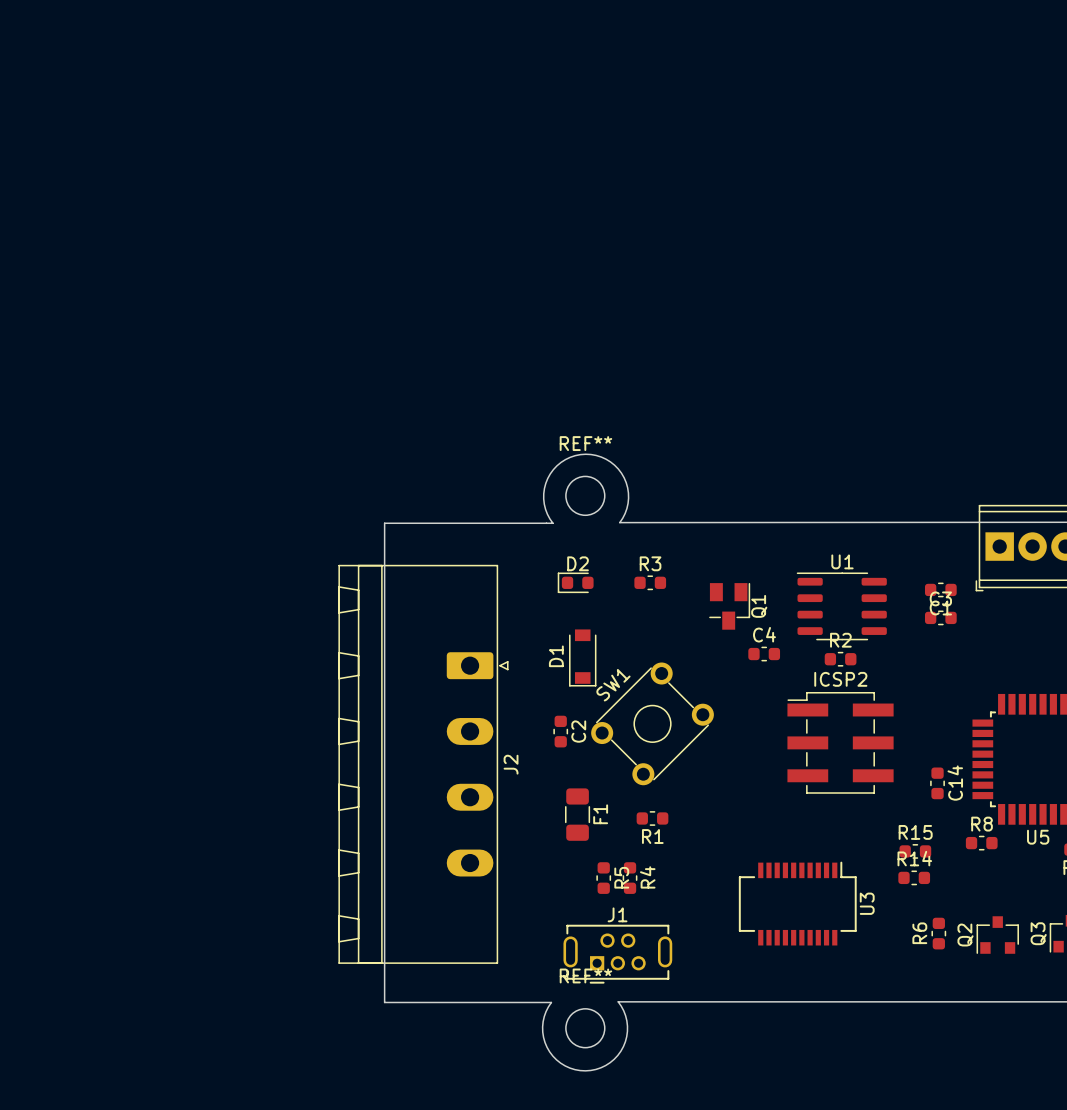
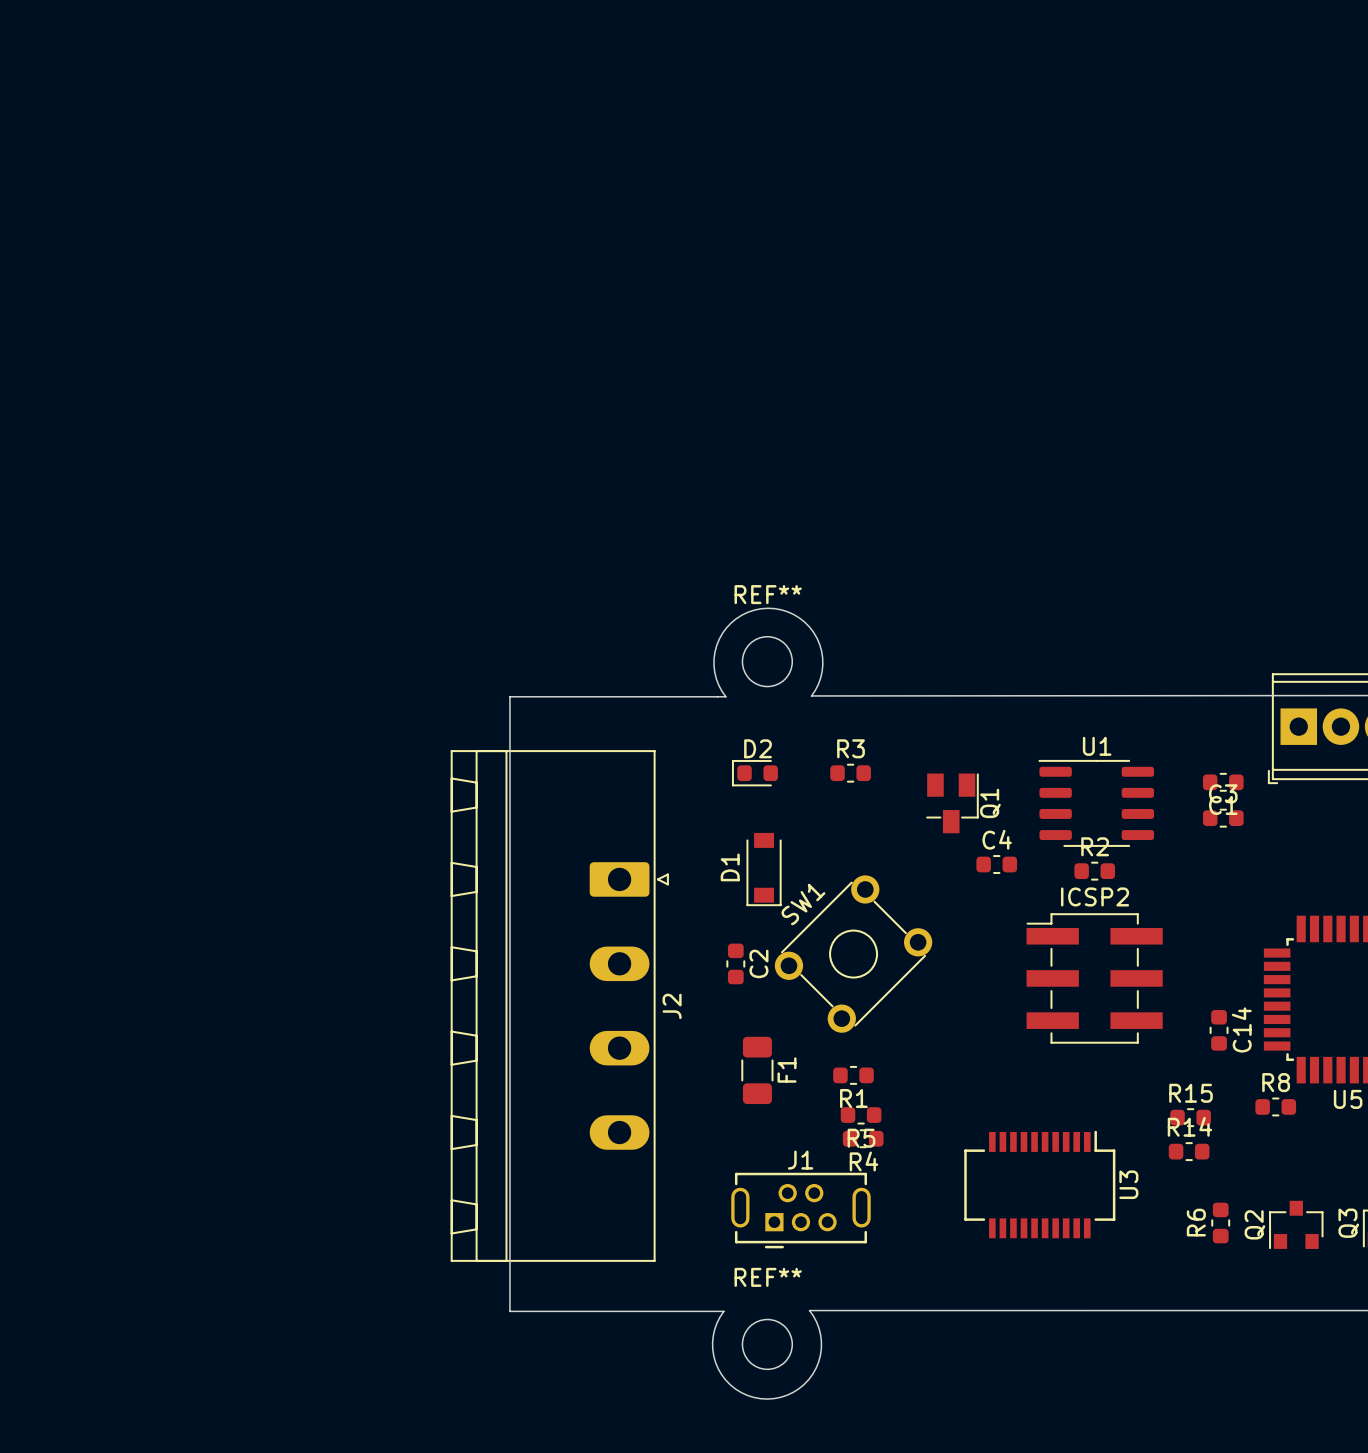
R5 rotation: 0° (603, 878) -> 90° clockwise (861, 1115)
R5 position: (603, 878) -> (861, 1115)
R4 rotation: 0° (630, 878) -> 90° clockwise (863, 1138)
R4 position: (630, 878) -> (863, 1138)
J1 position: (617, 954) -> (800, 1210)

